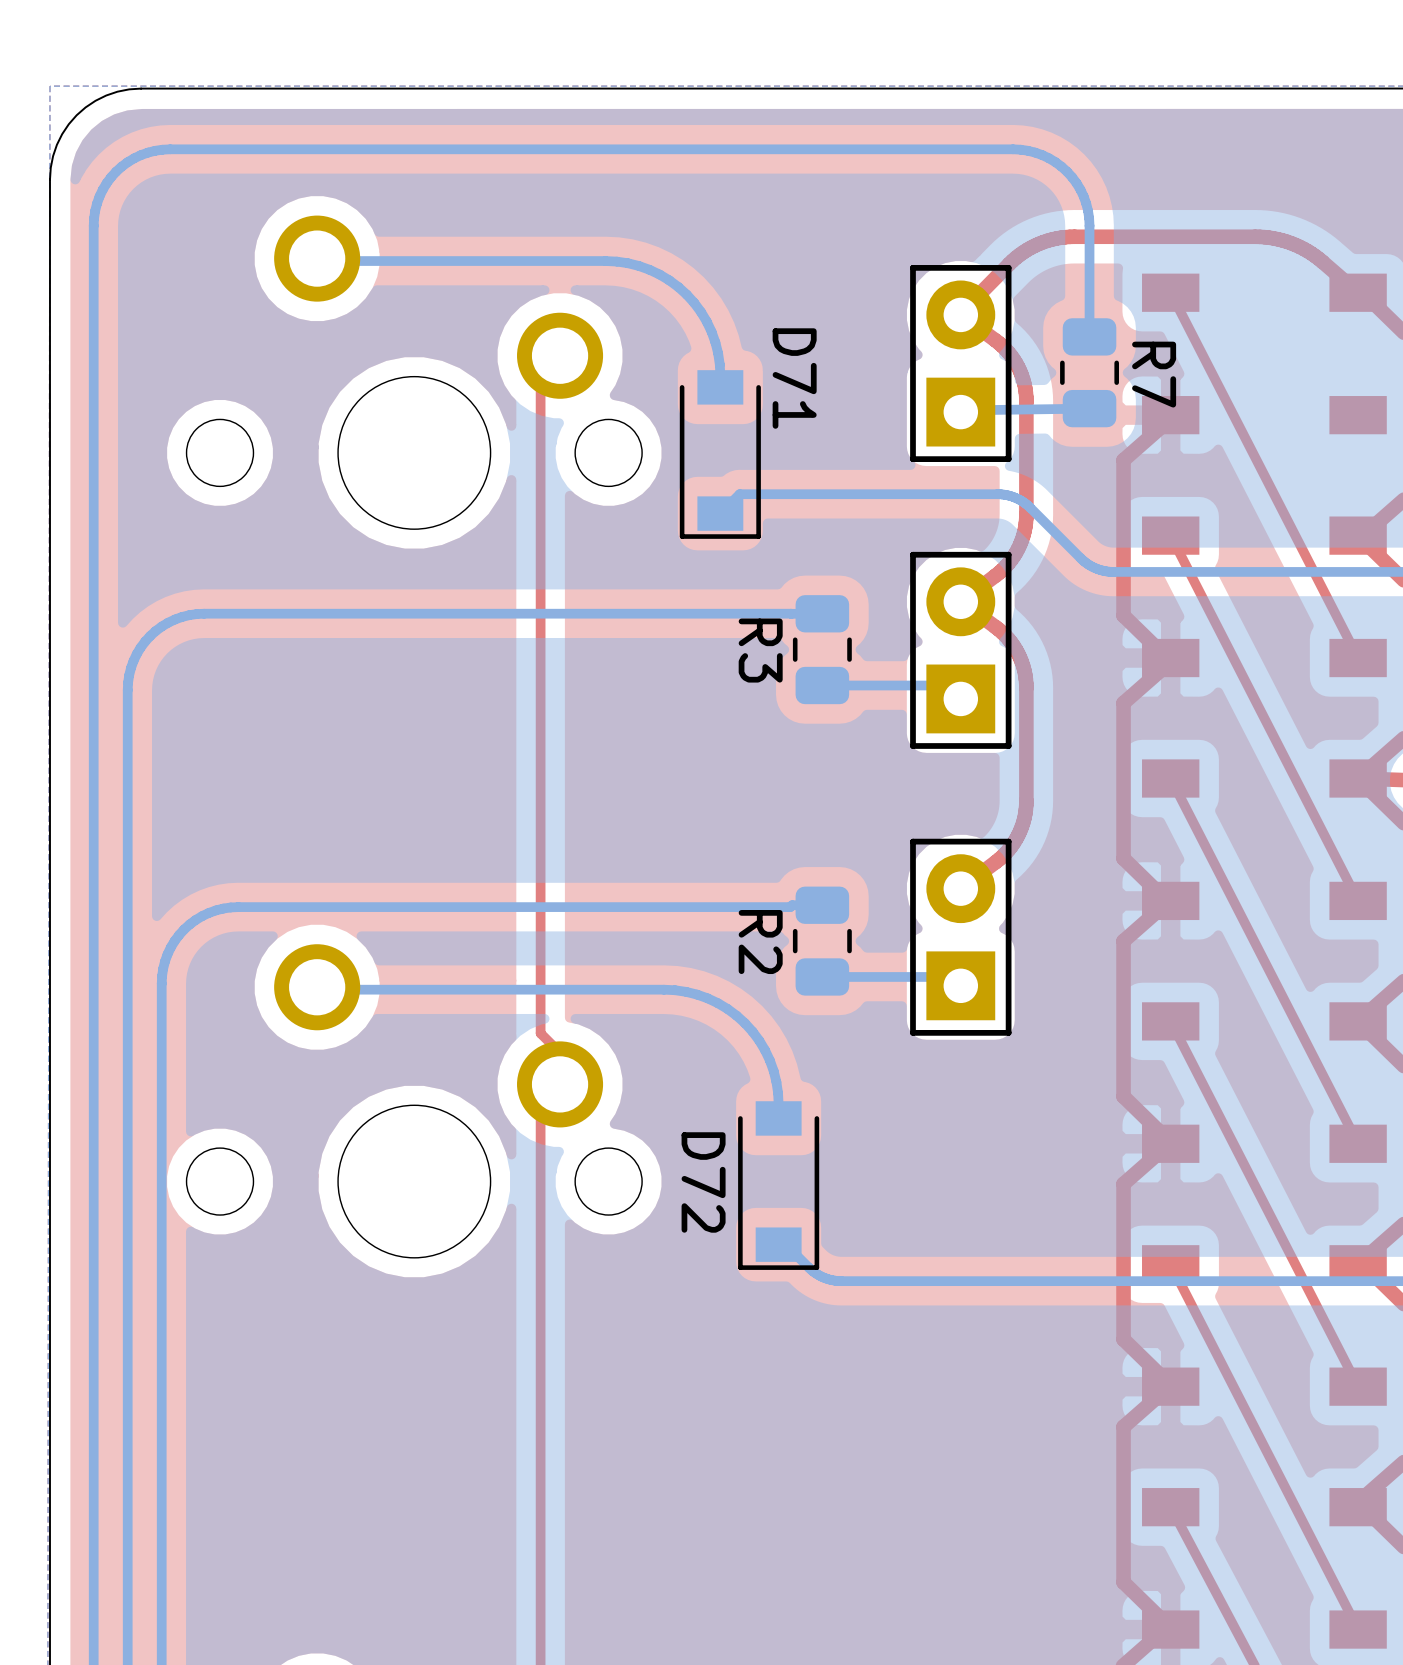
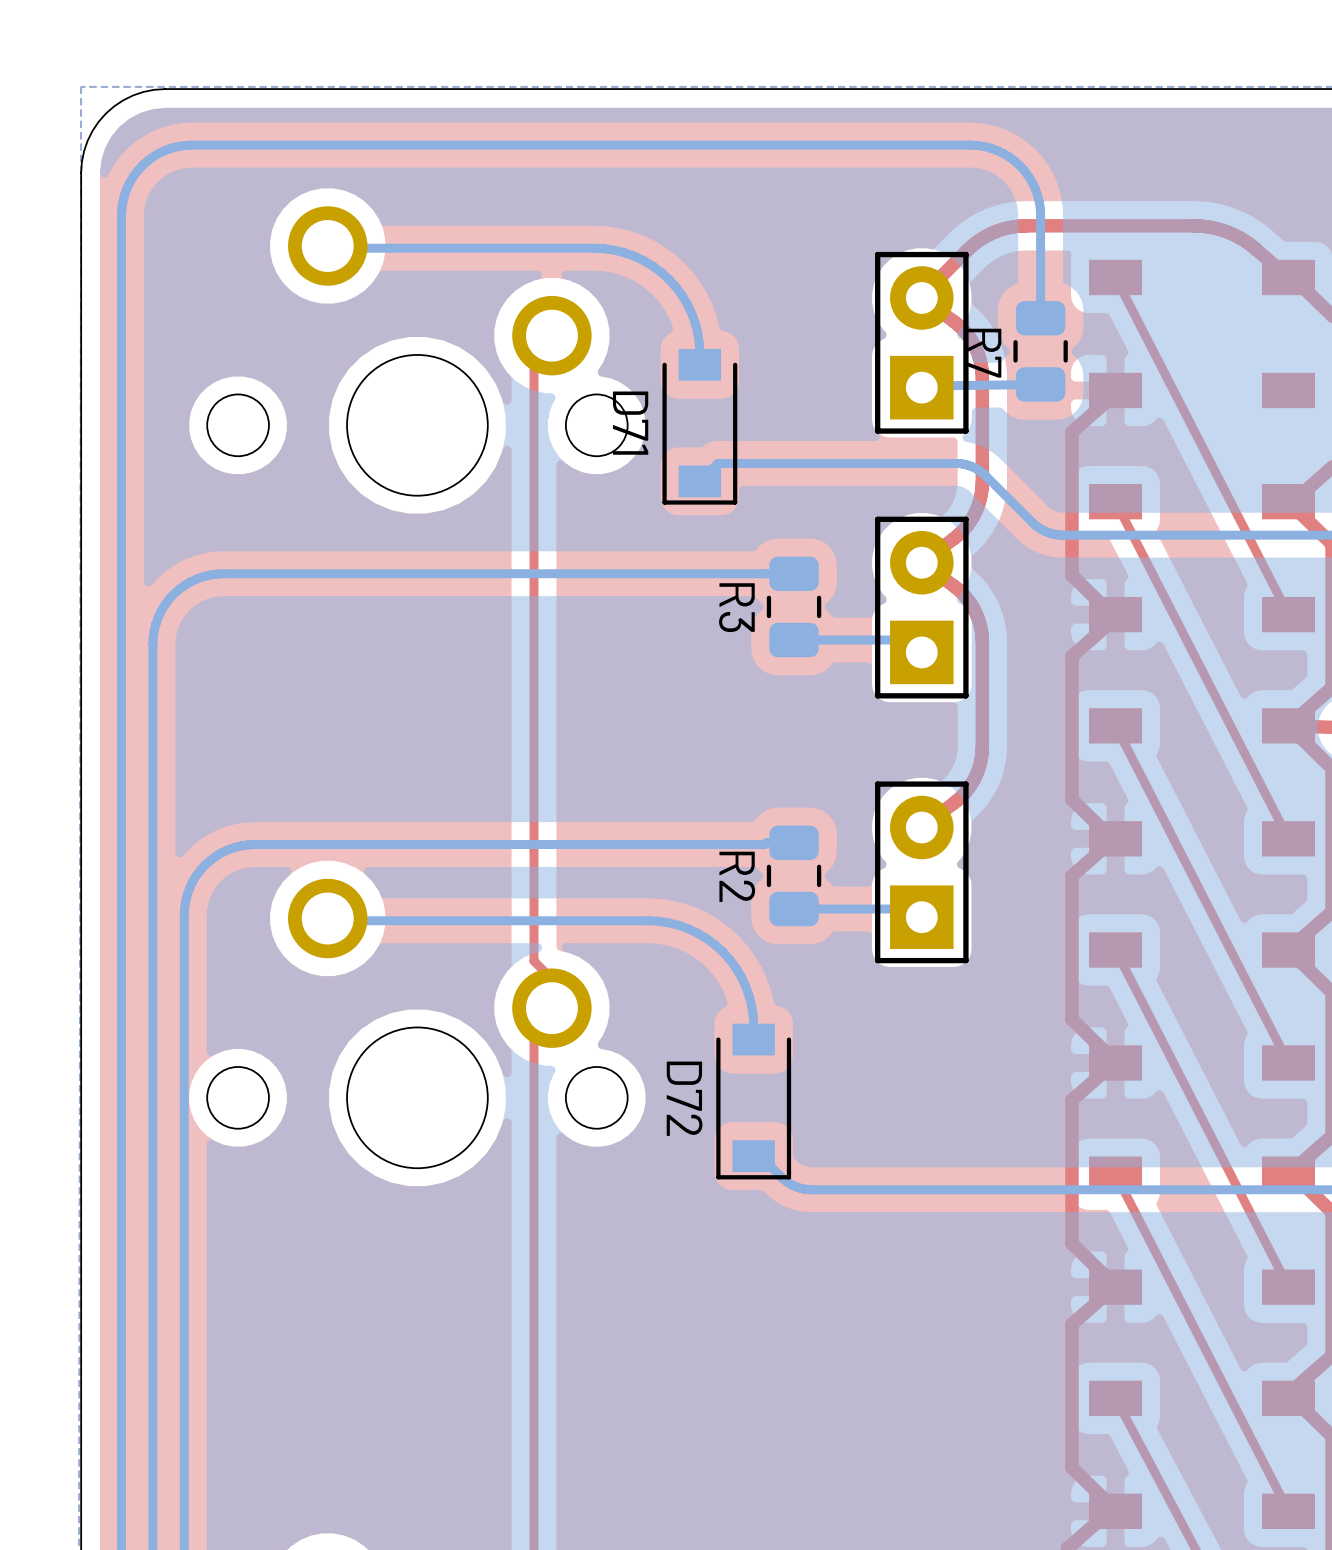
R7 name position: R7 (1154, 374) -> R7 (983, 353)
D71 name position: D71 (794, 378) -> D71 (630, 423)

